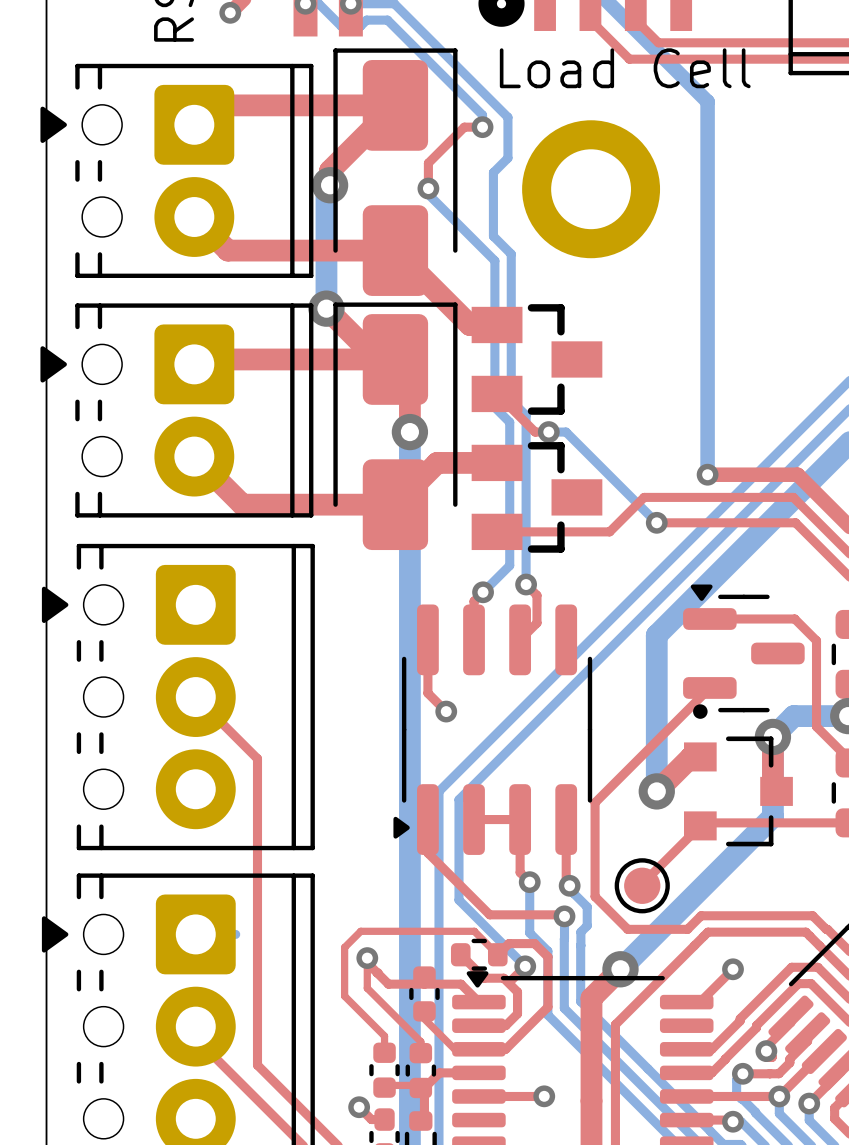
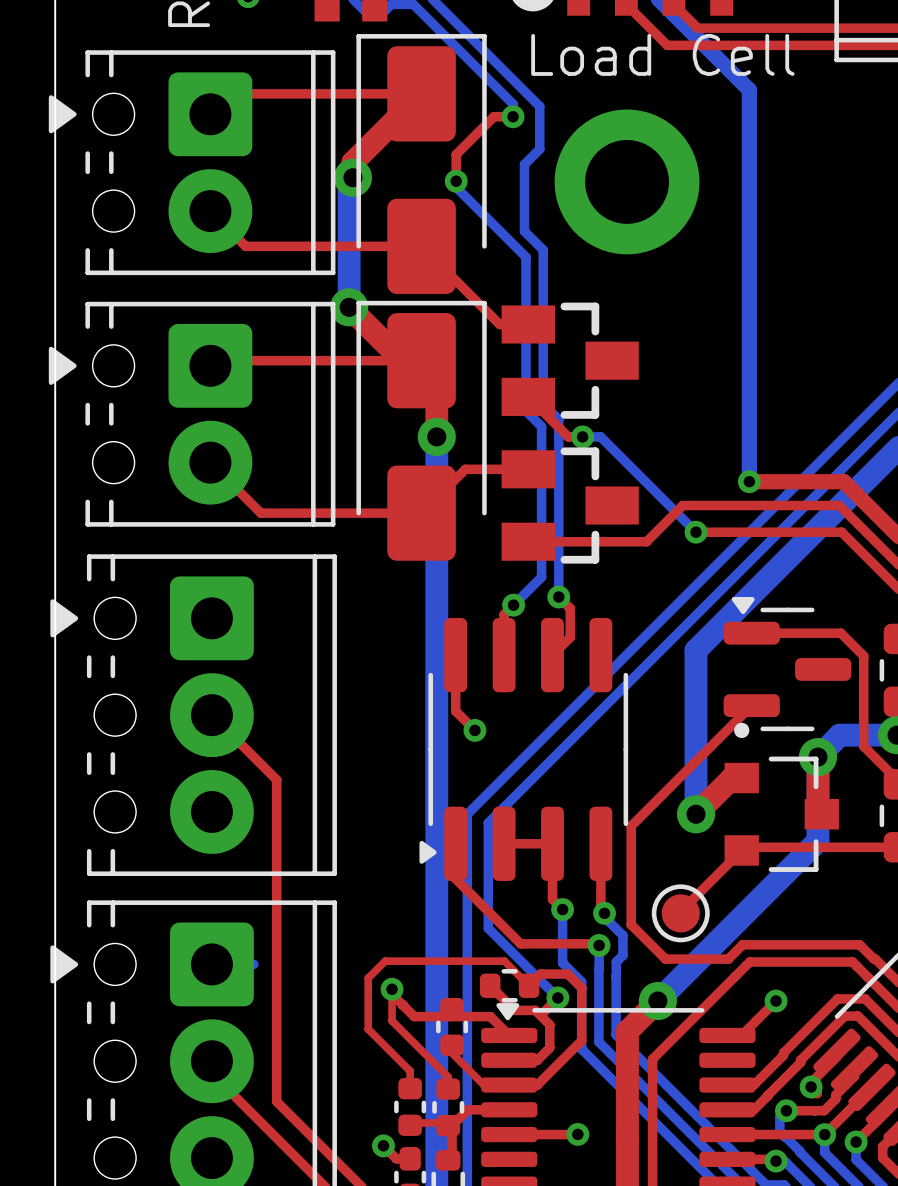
top track width: thick (395, 105) (213, 105) (194, 124) -> thin (421, 93) (230, 93) (210, 114)
top track width: thick (194, 217) (227, 250) (395, 250) (469, 324) (497, 324) -> thin (210, 211) (245, 246) (421, 246) (499, 324) (528, 324)
top track width: thick (377, 359) (199, 359) (194, 364) -> thin (402, 360) (215, 360) (210, 365)
top track width: thick (194, 456) (242, 504) (395, 504) (437, 462) (497, 462) -> thin (210, 462) (260, 513) (421, 513) (465, 469) (528, 469)

